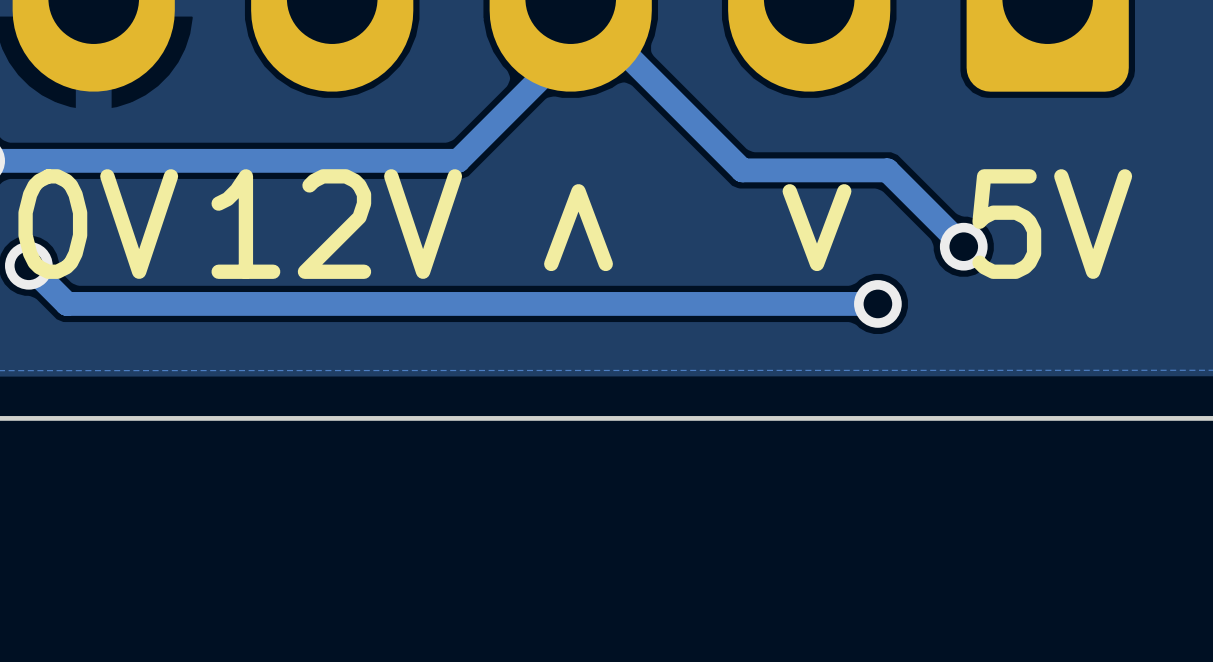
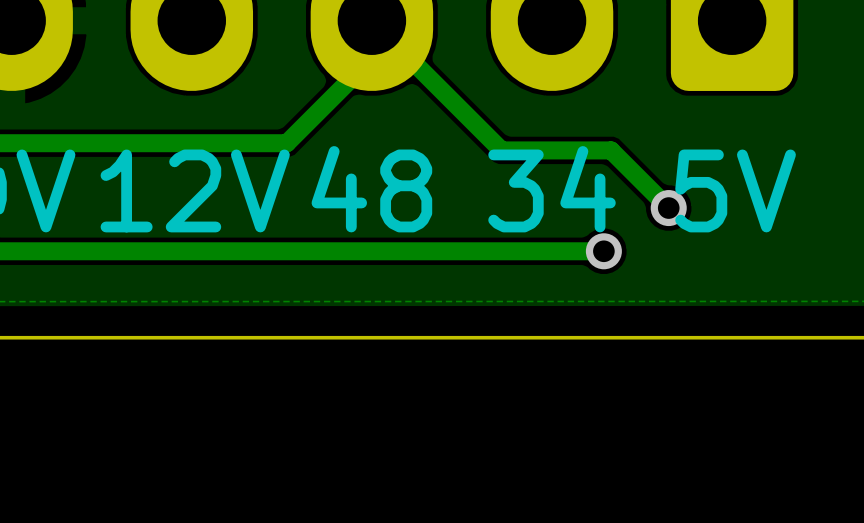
text: > (578, 227) -> 48 (371, 189)
text: < (817, 227) -> 34 (552, 189)

